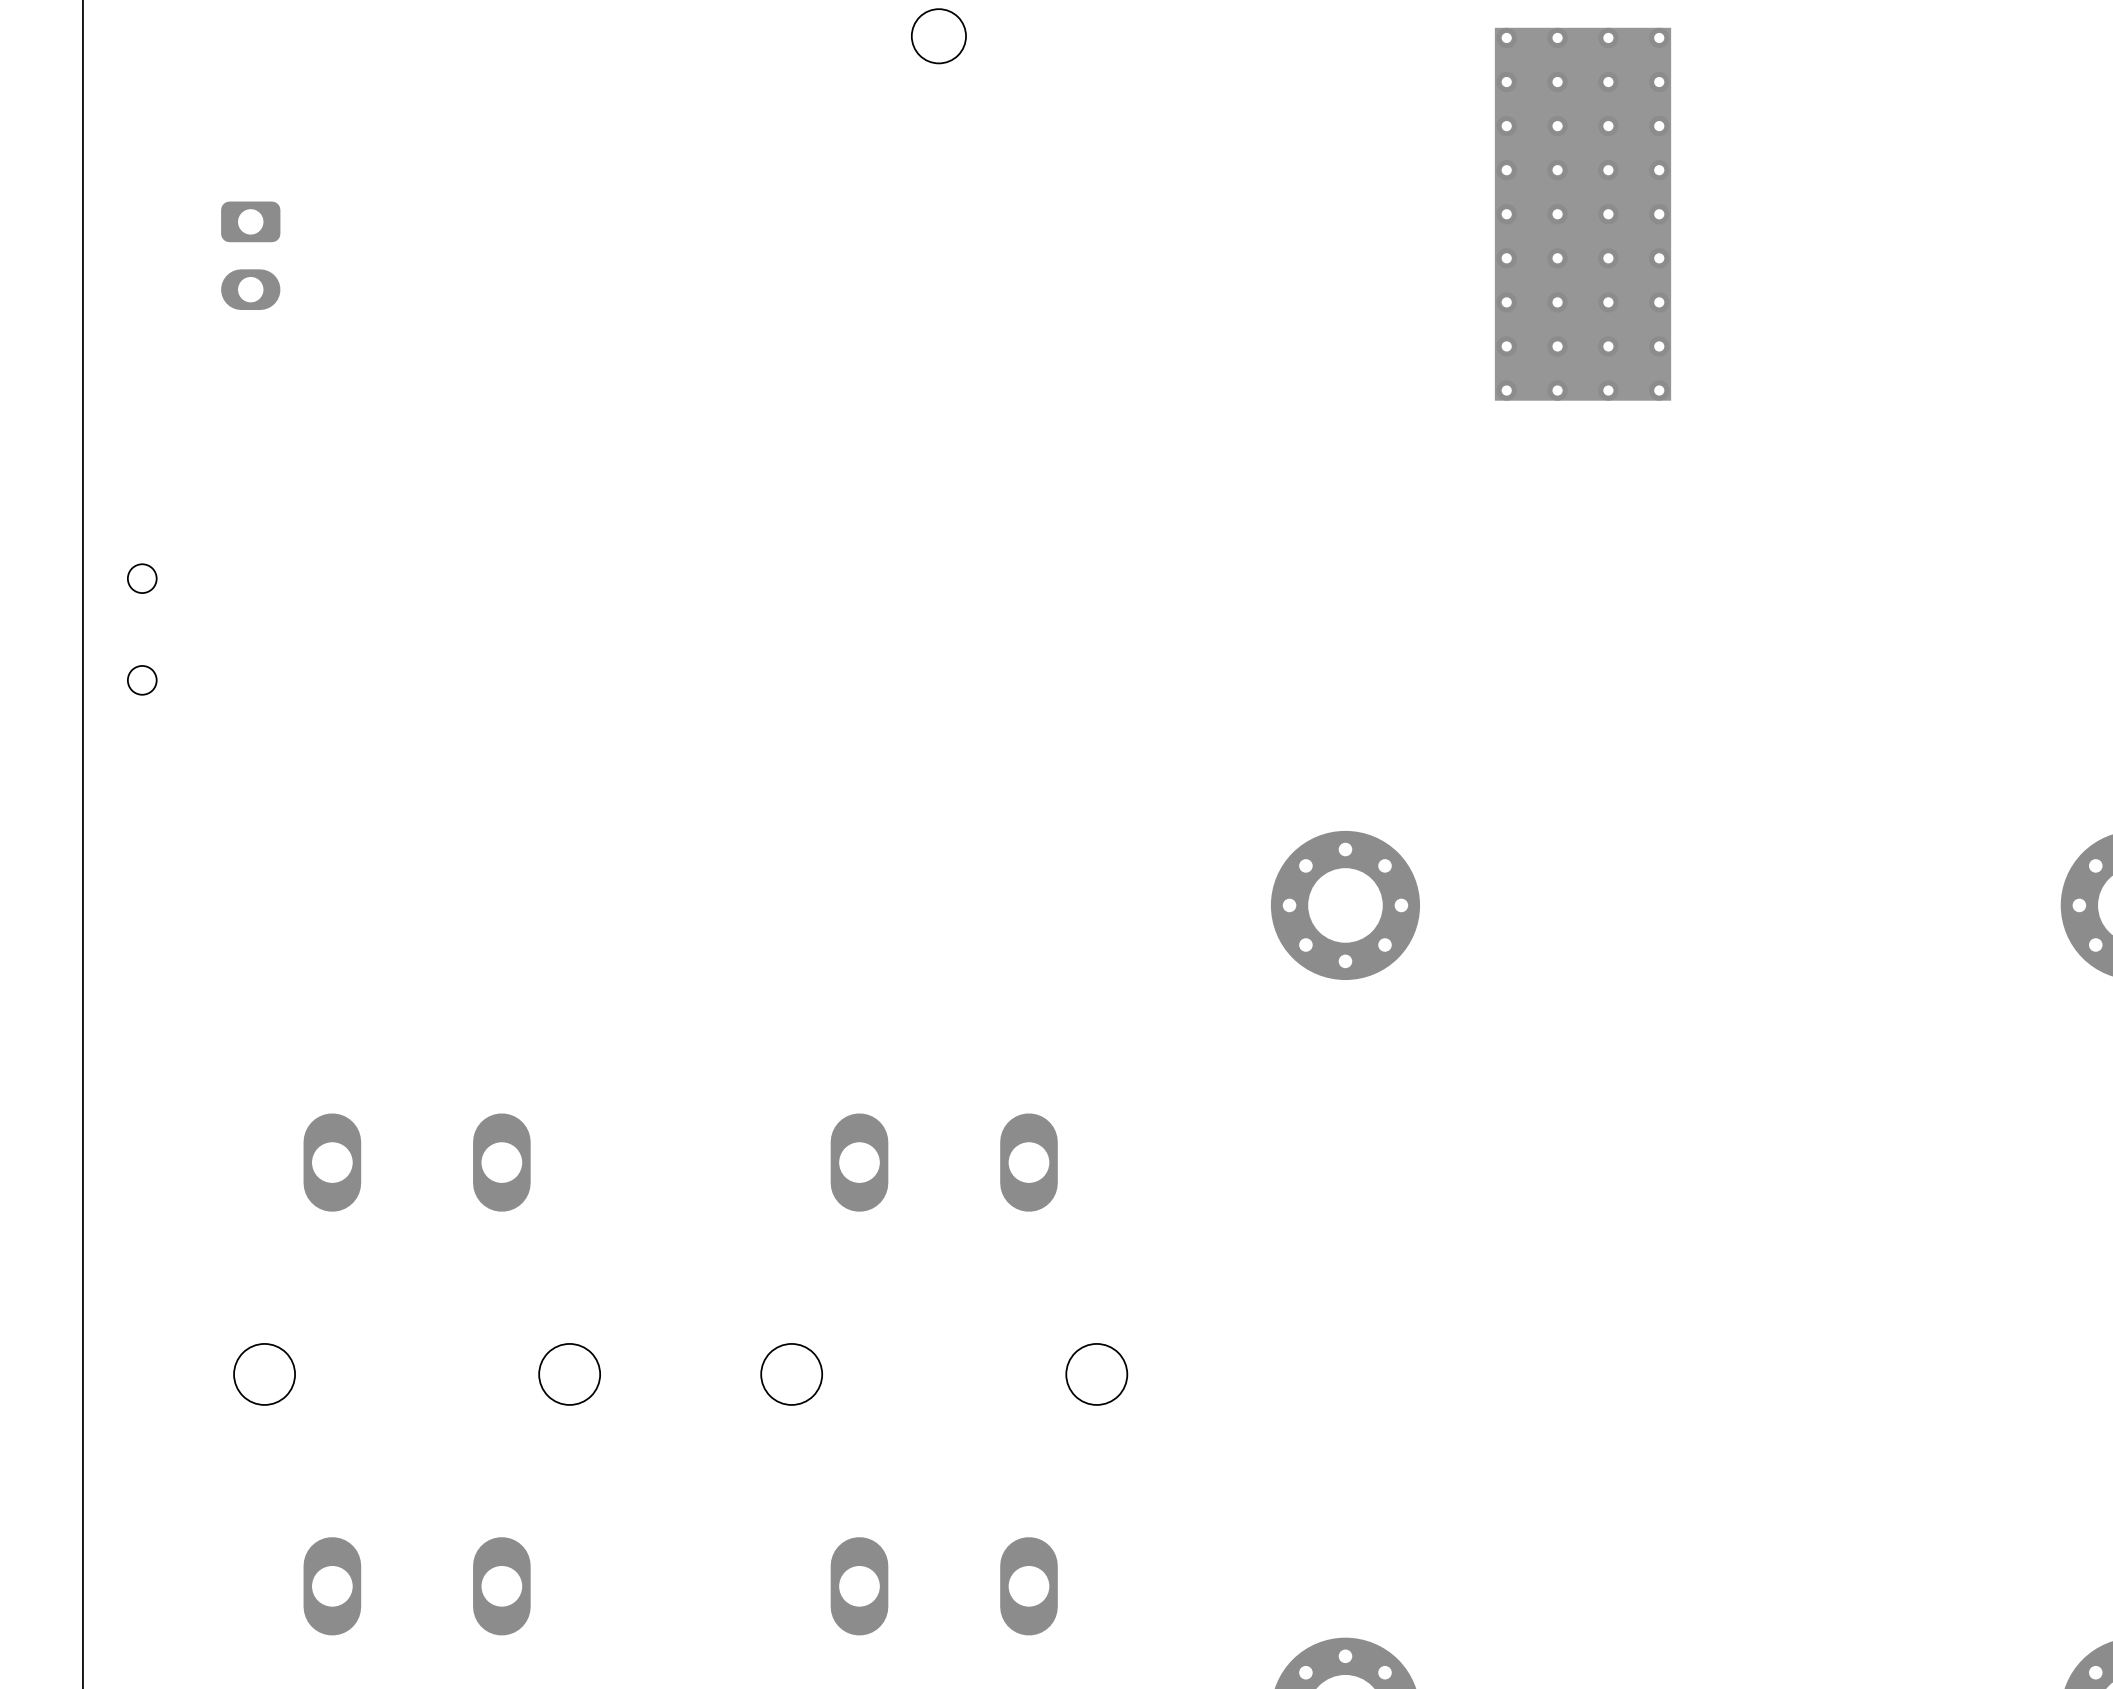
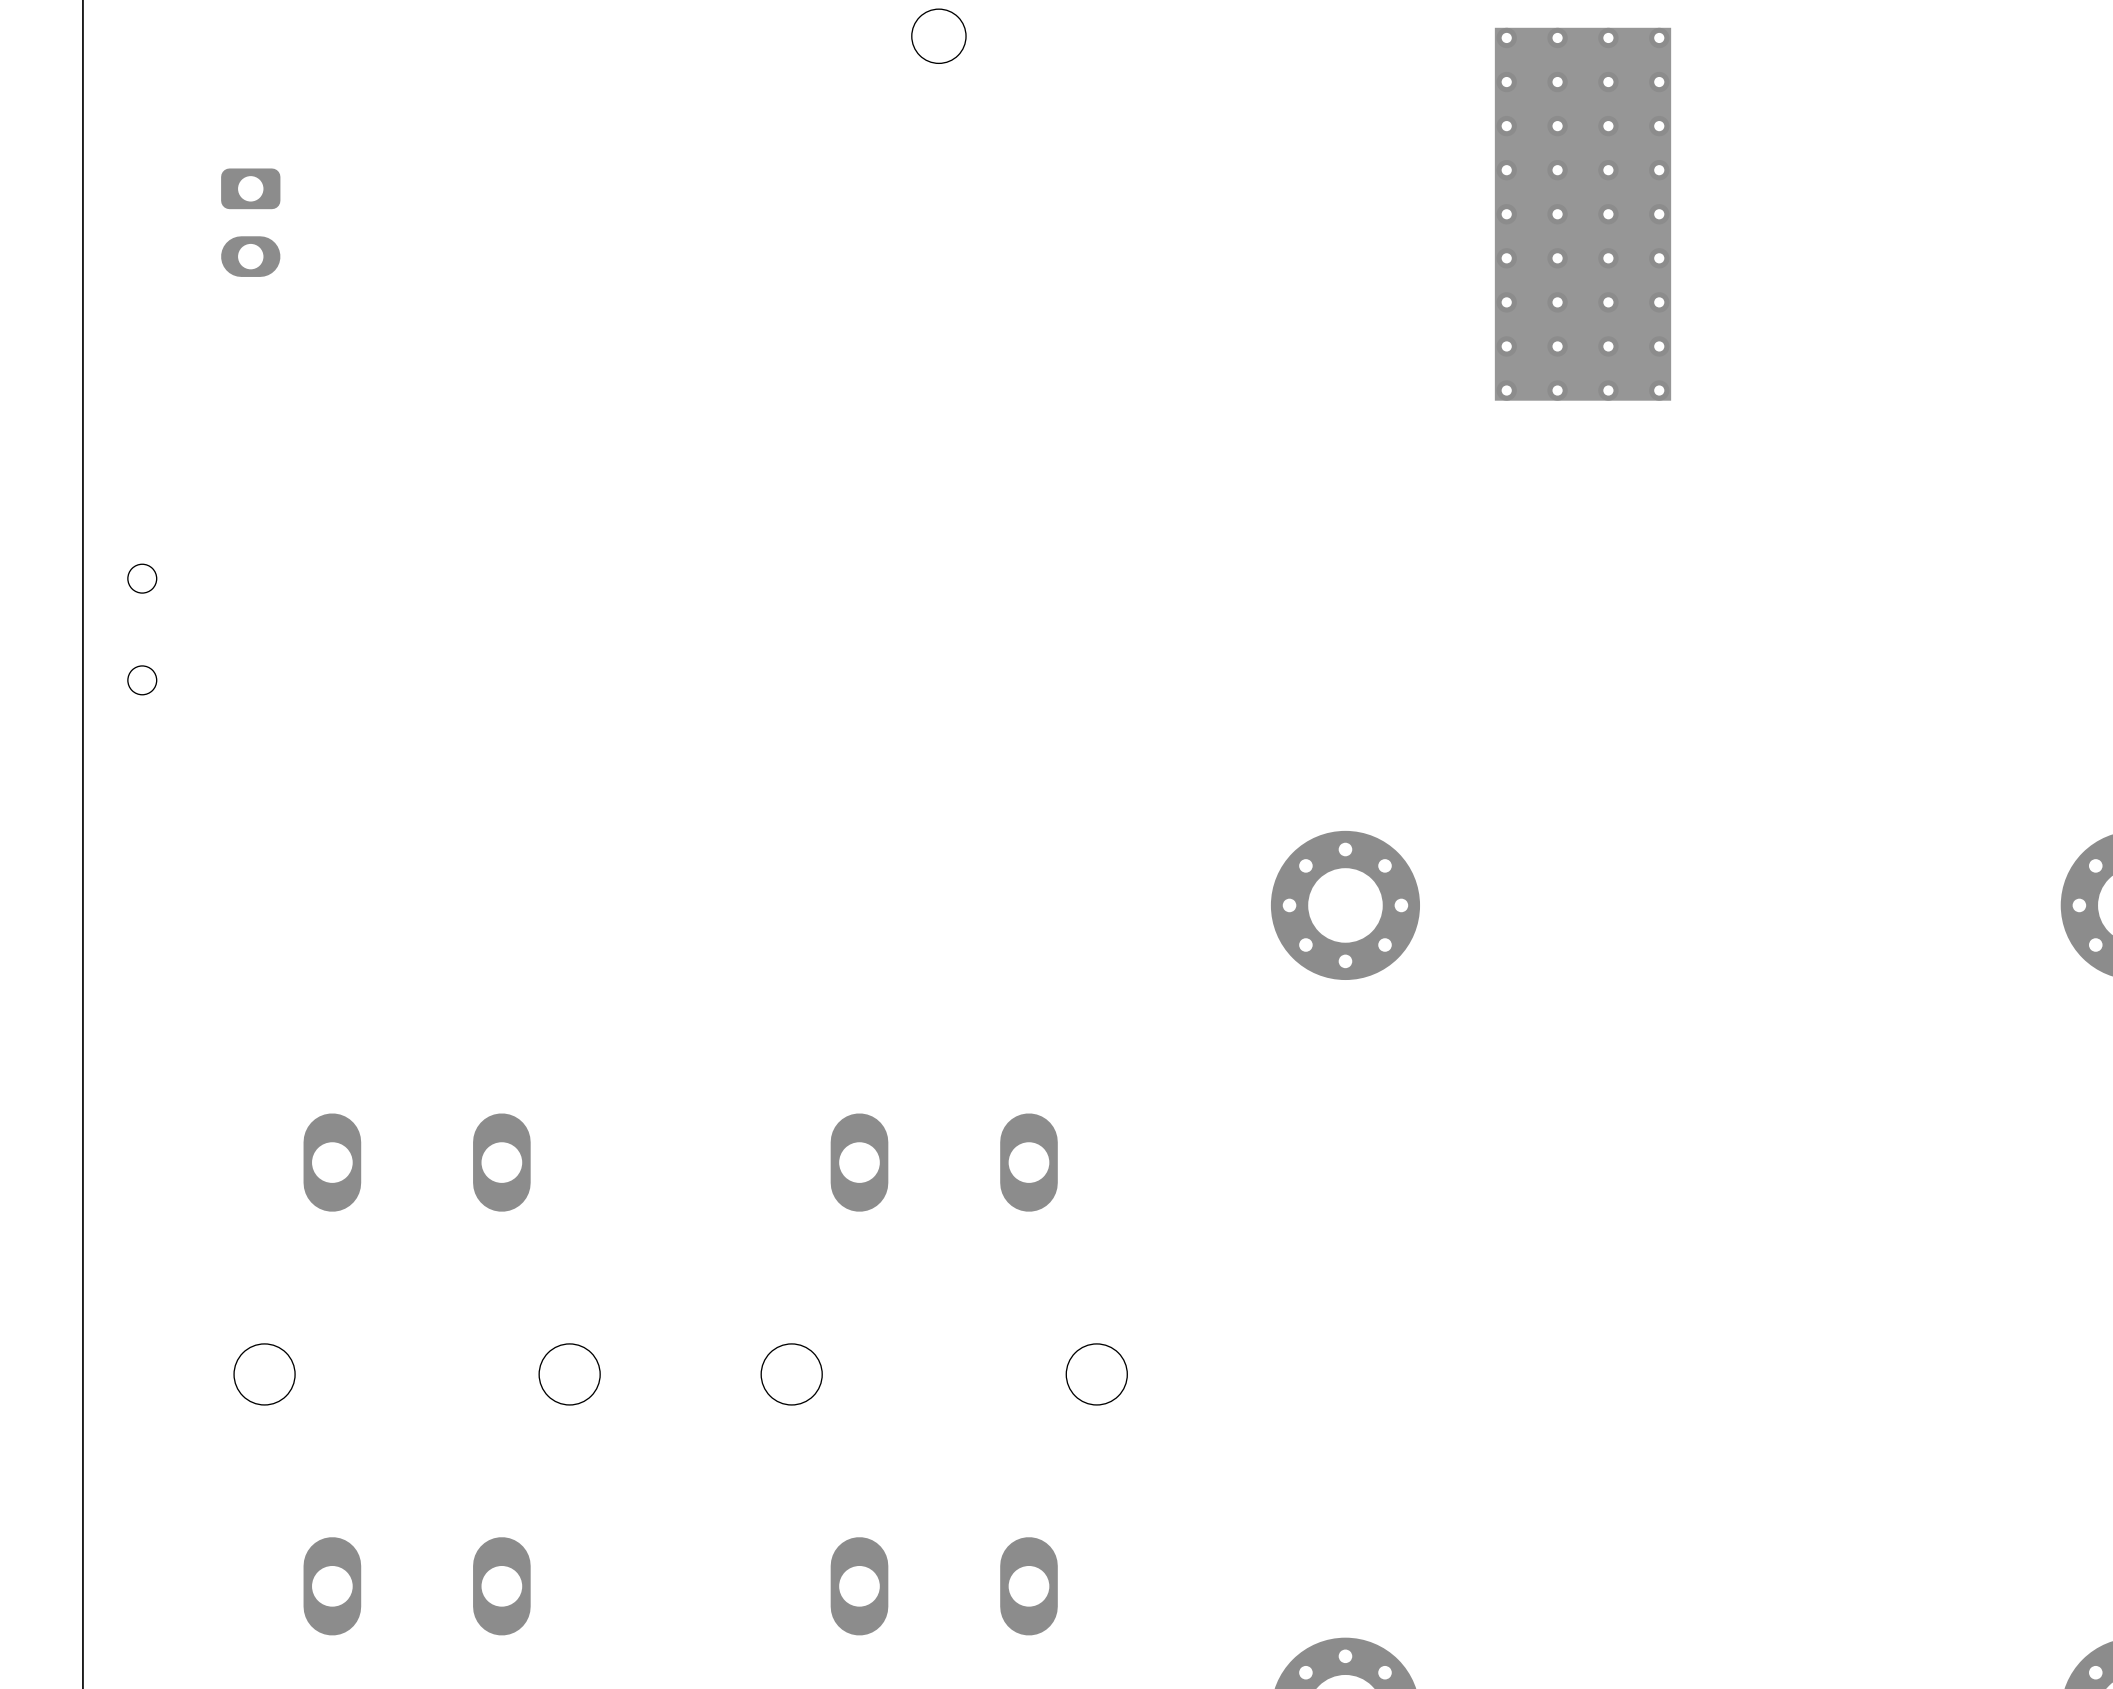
part position: (250, 255) -> (250, 222)

